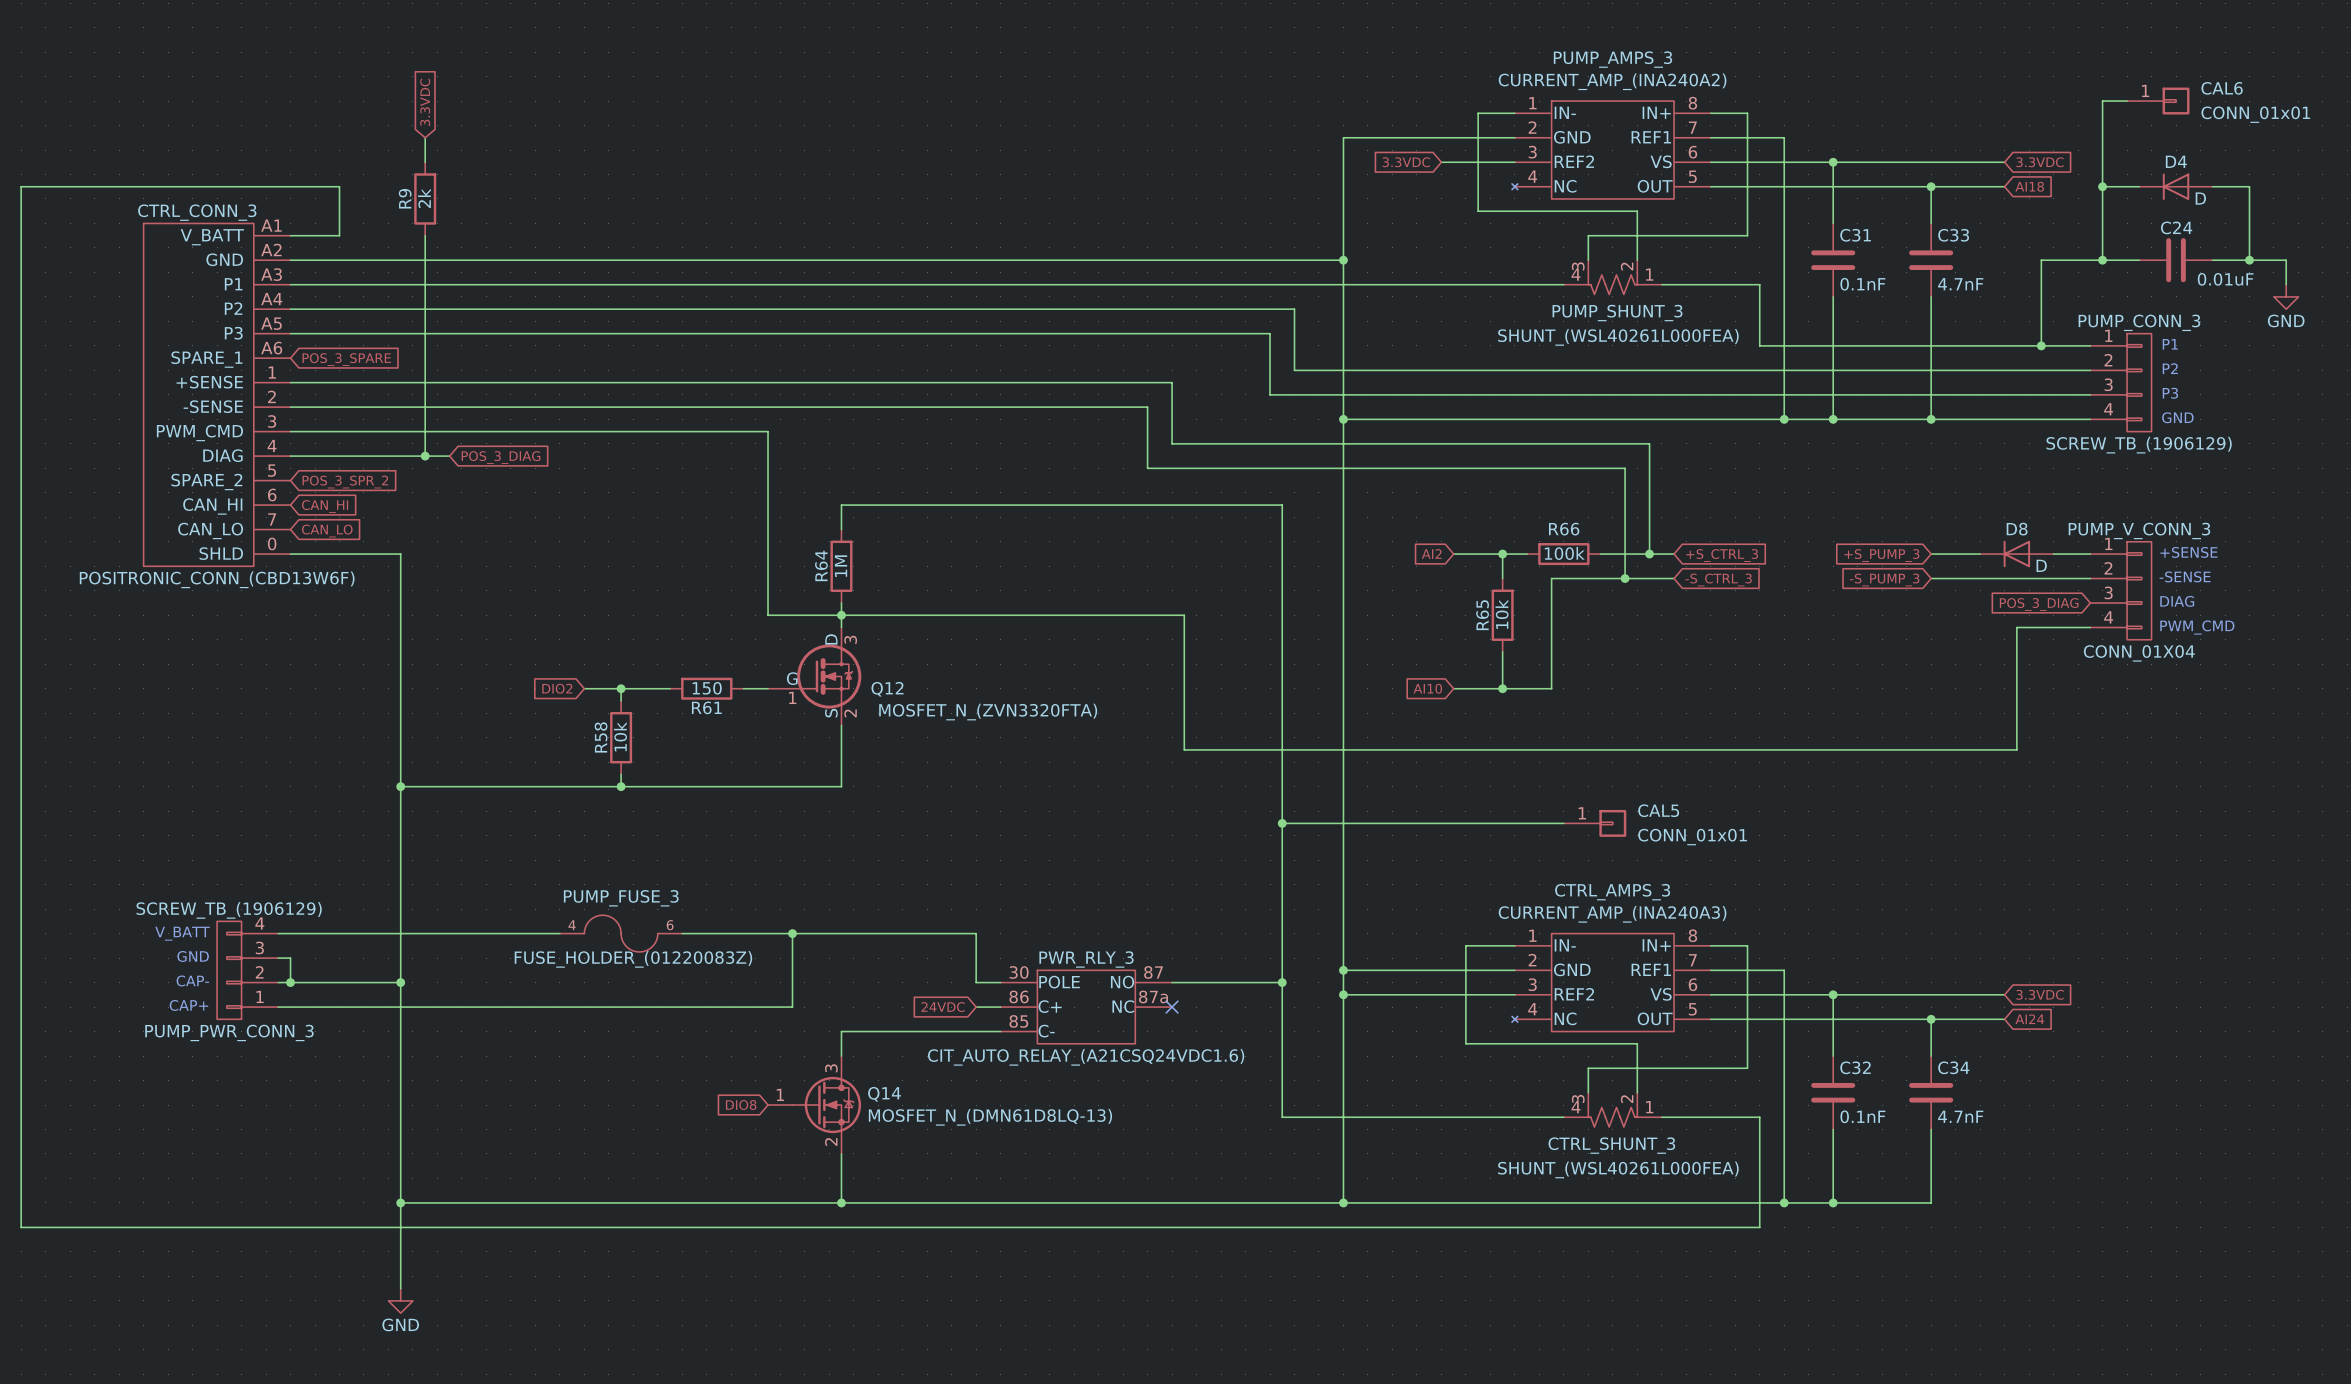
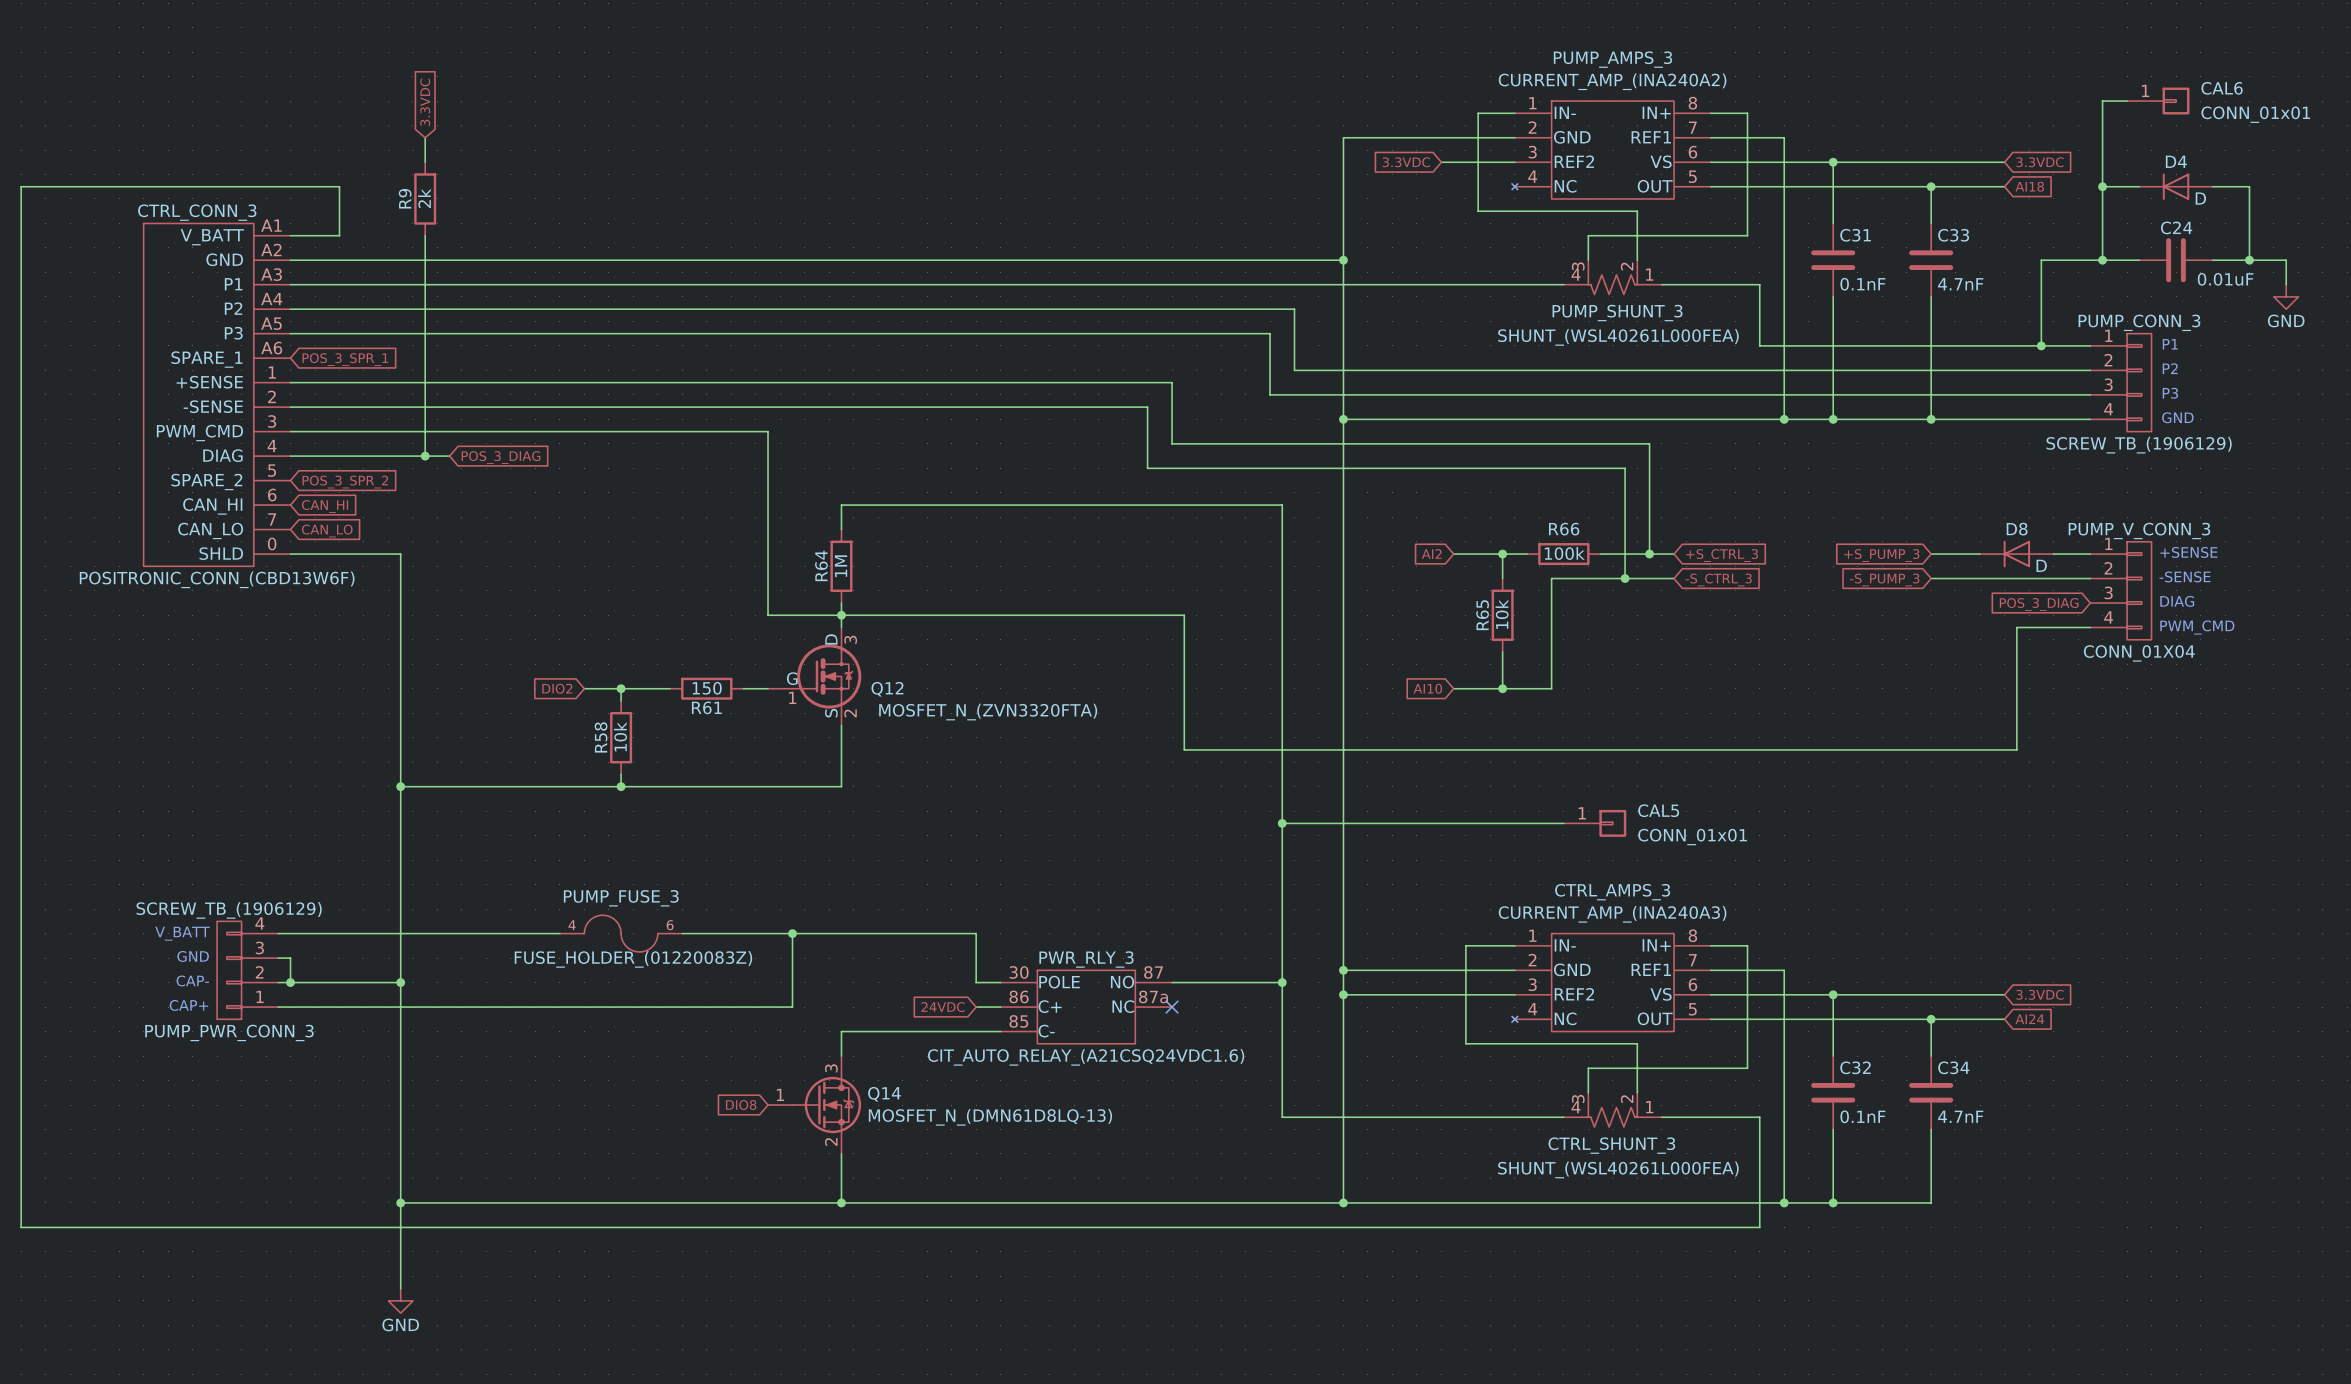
global label: POS_3_SPARE (346, 359) -> POS_3_SPR_1 (345, 359)

